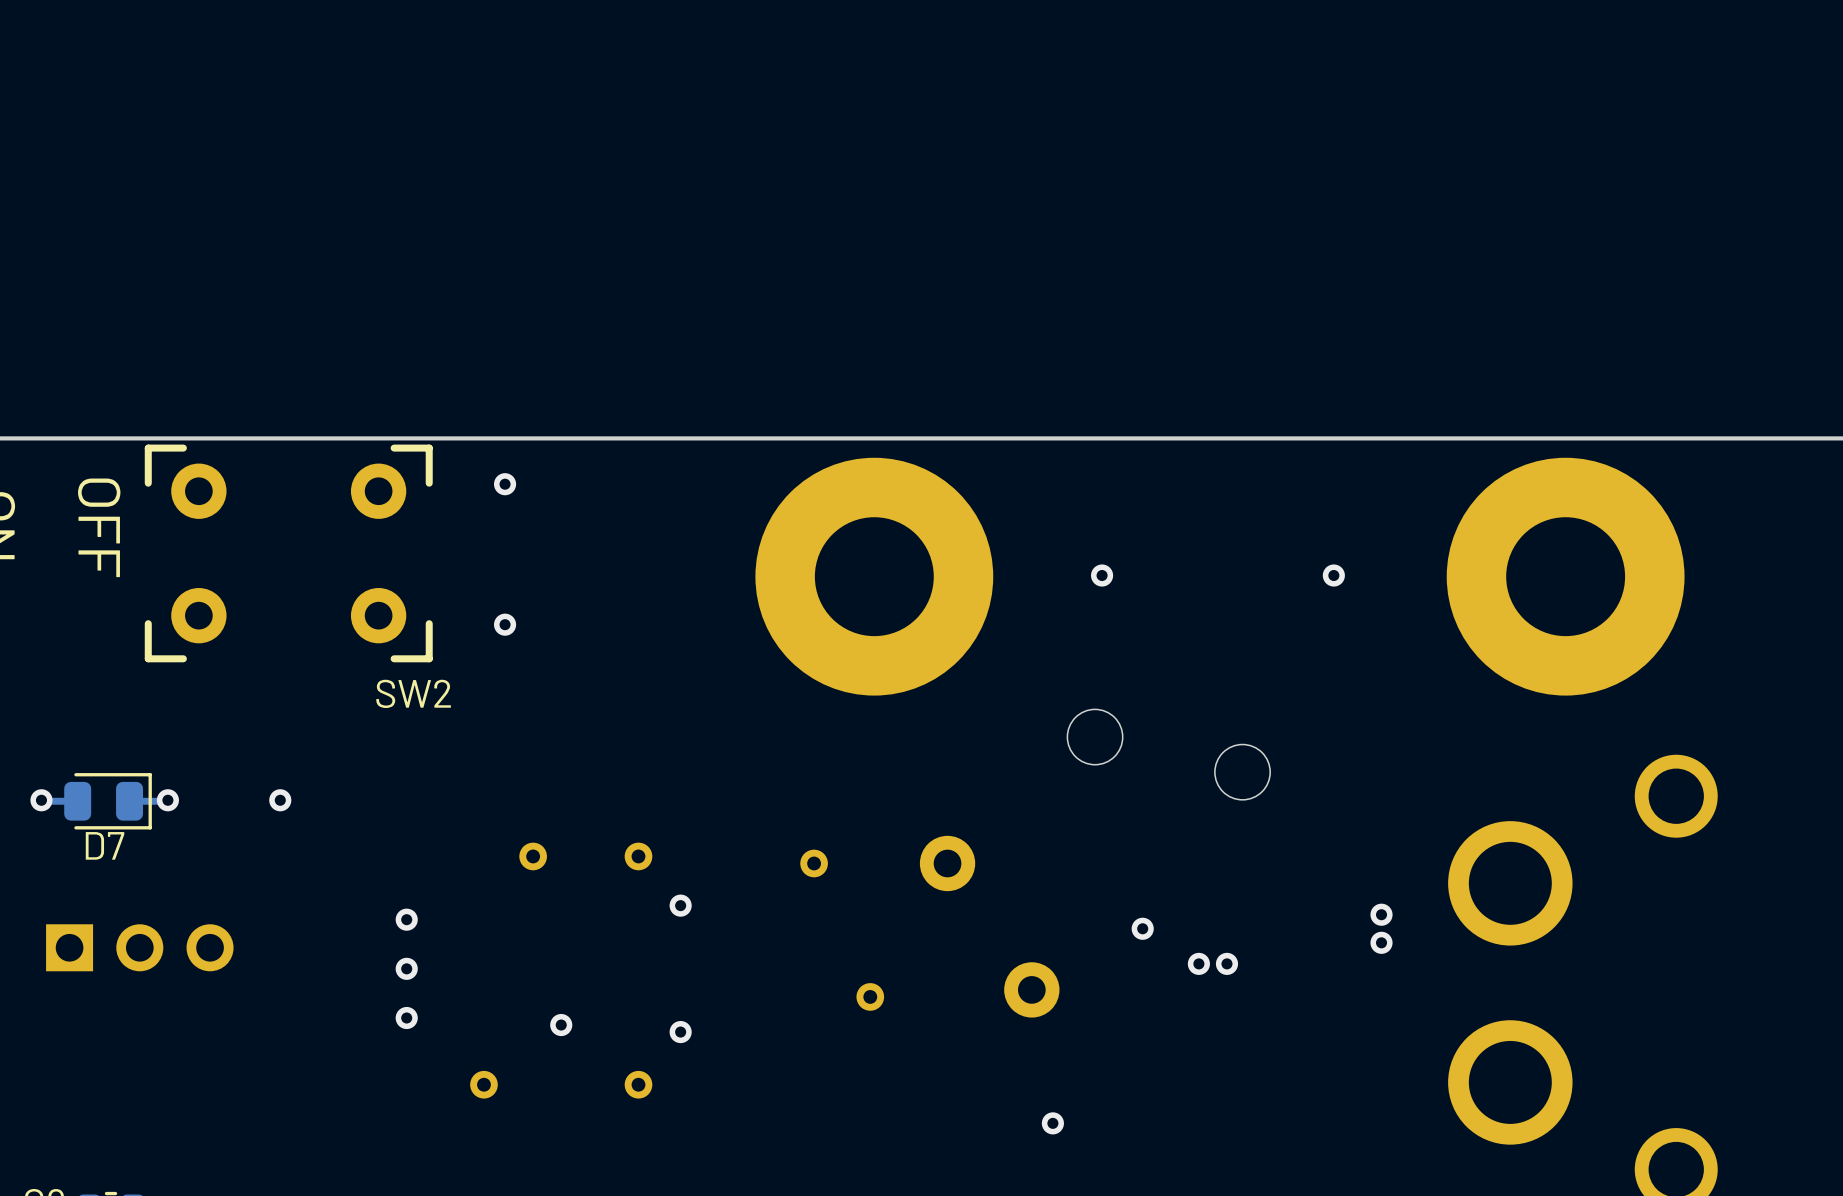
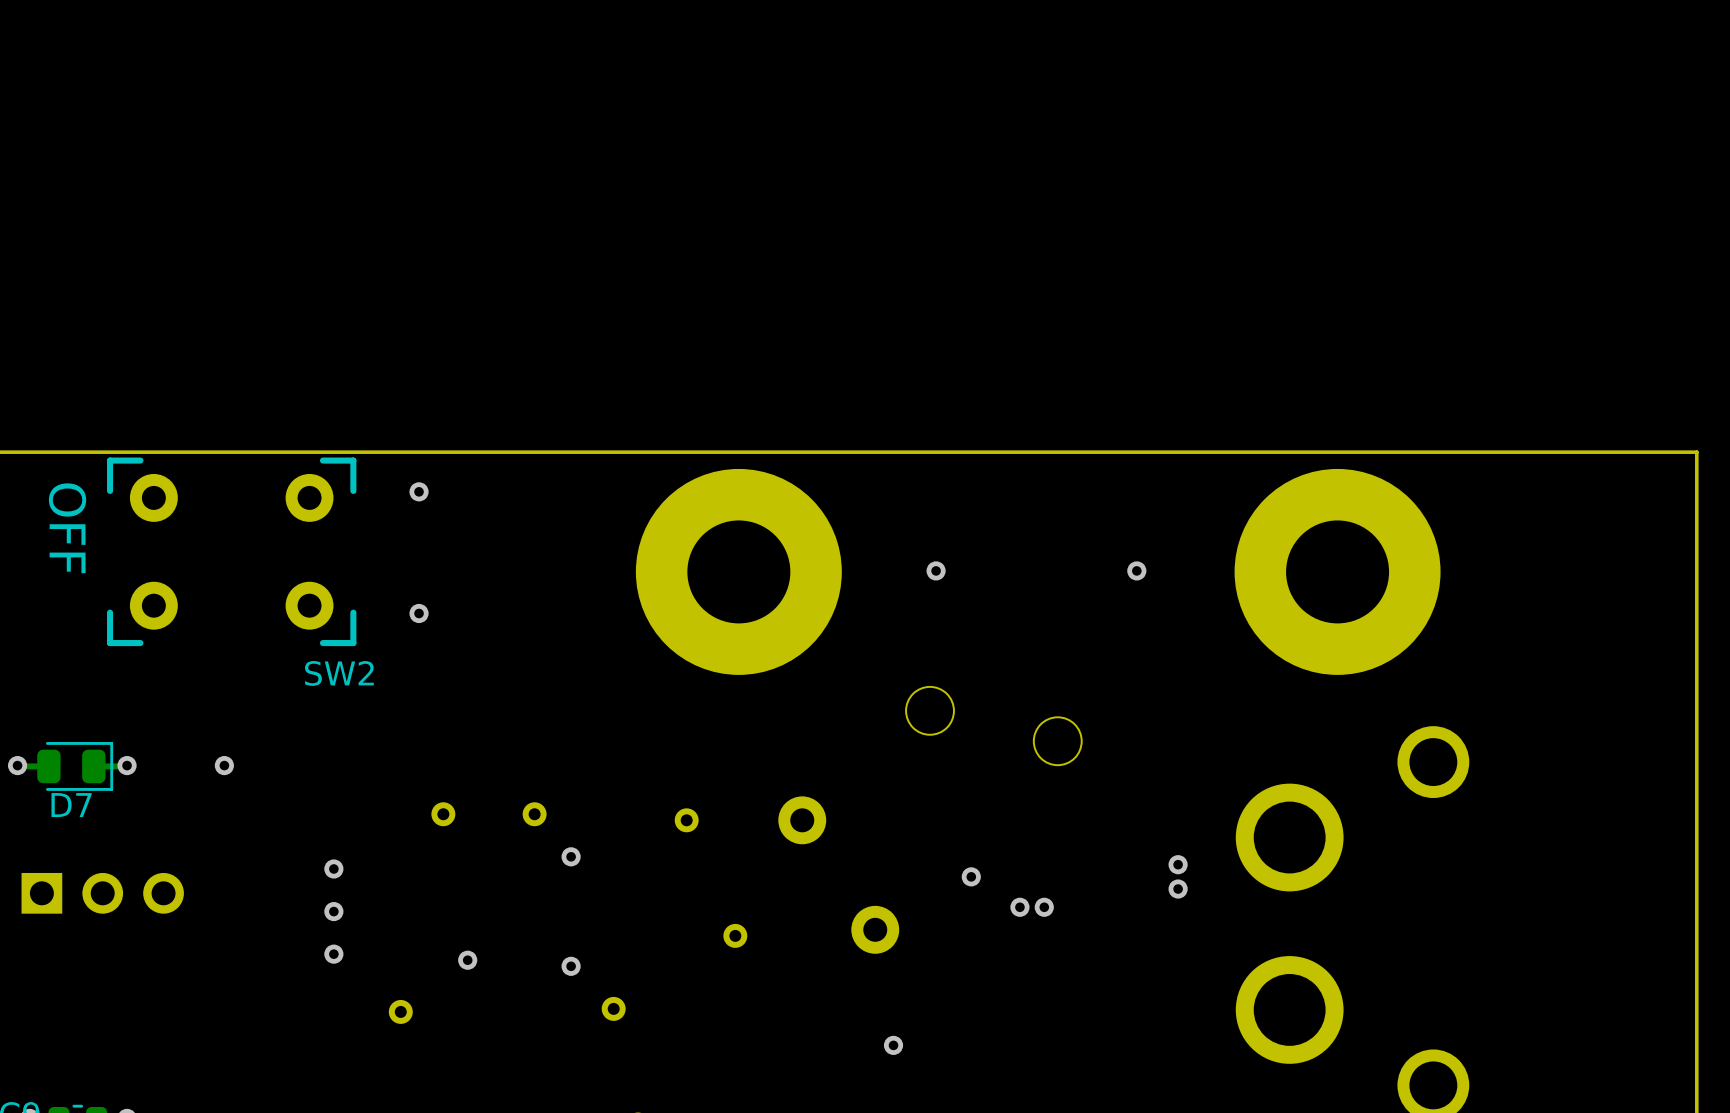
part position: (638, 1084) -> (613, 1008)

